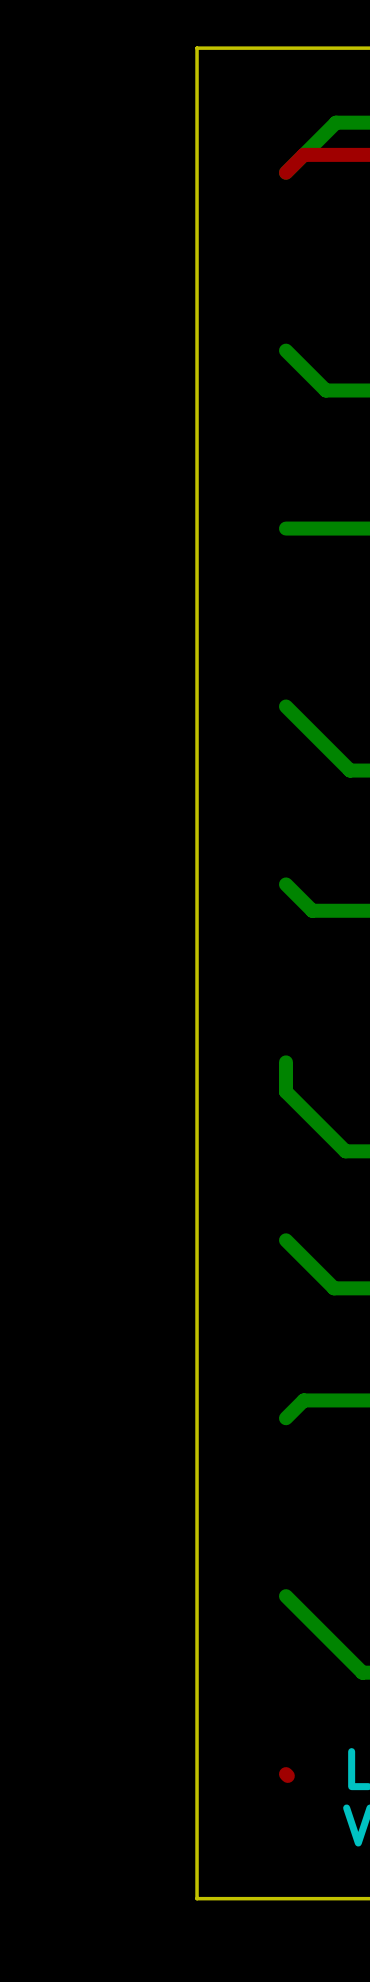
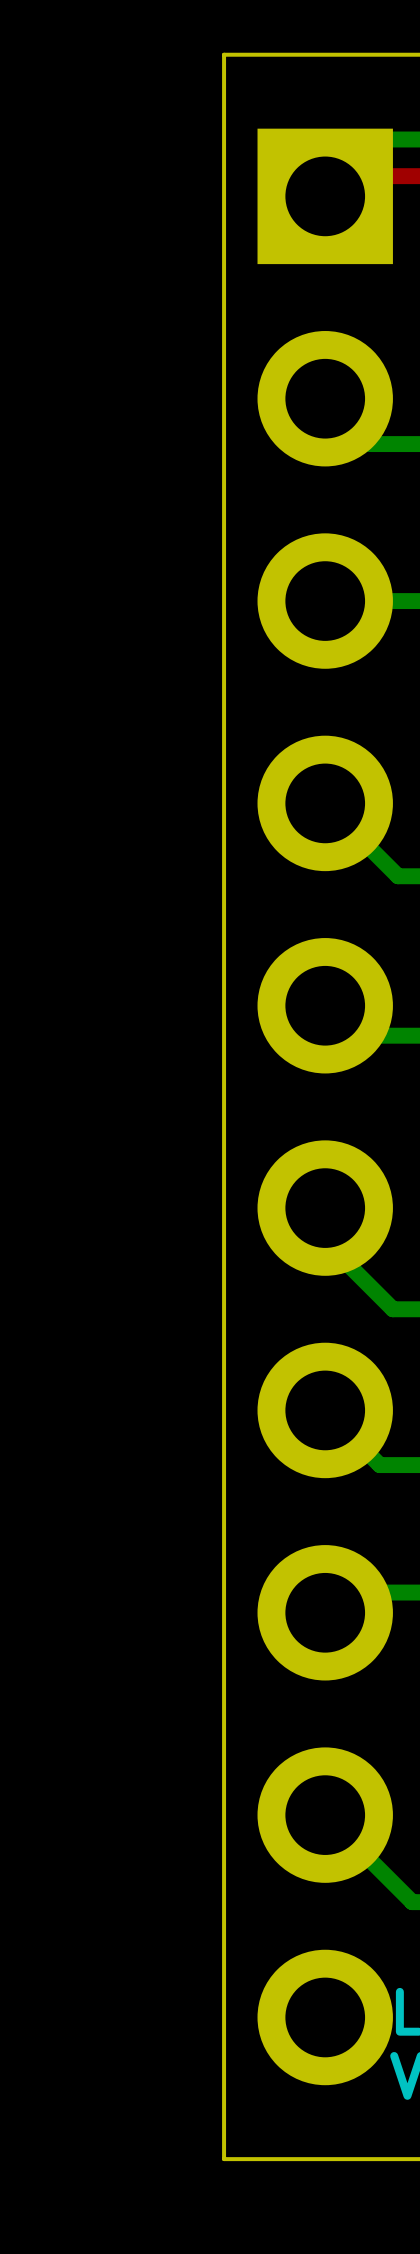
part: none -> (325, 1106)

